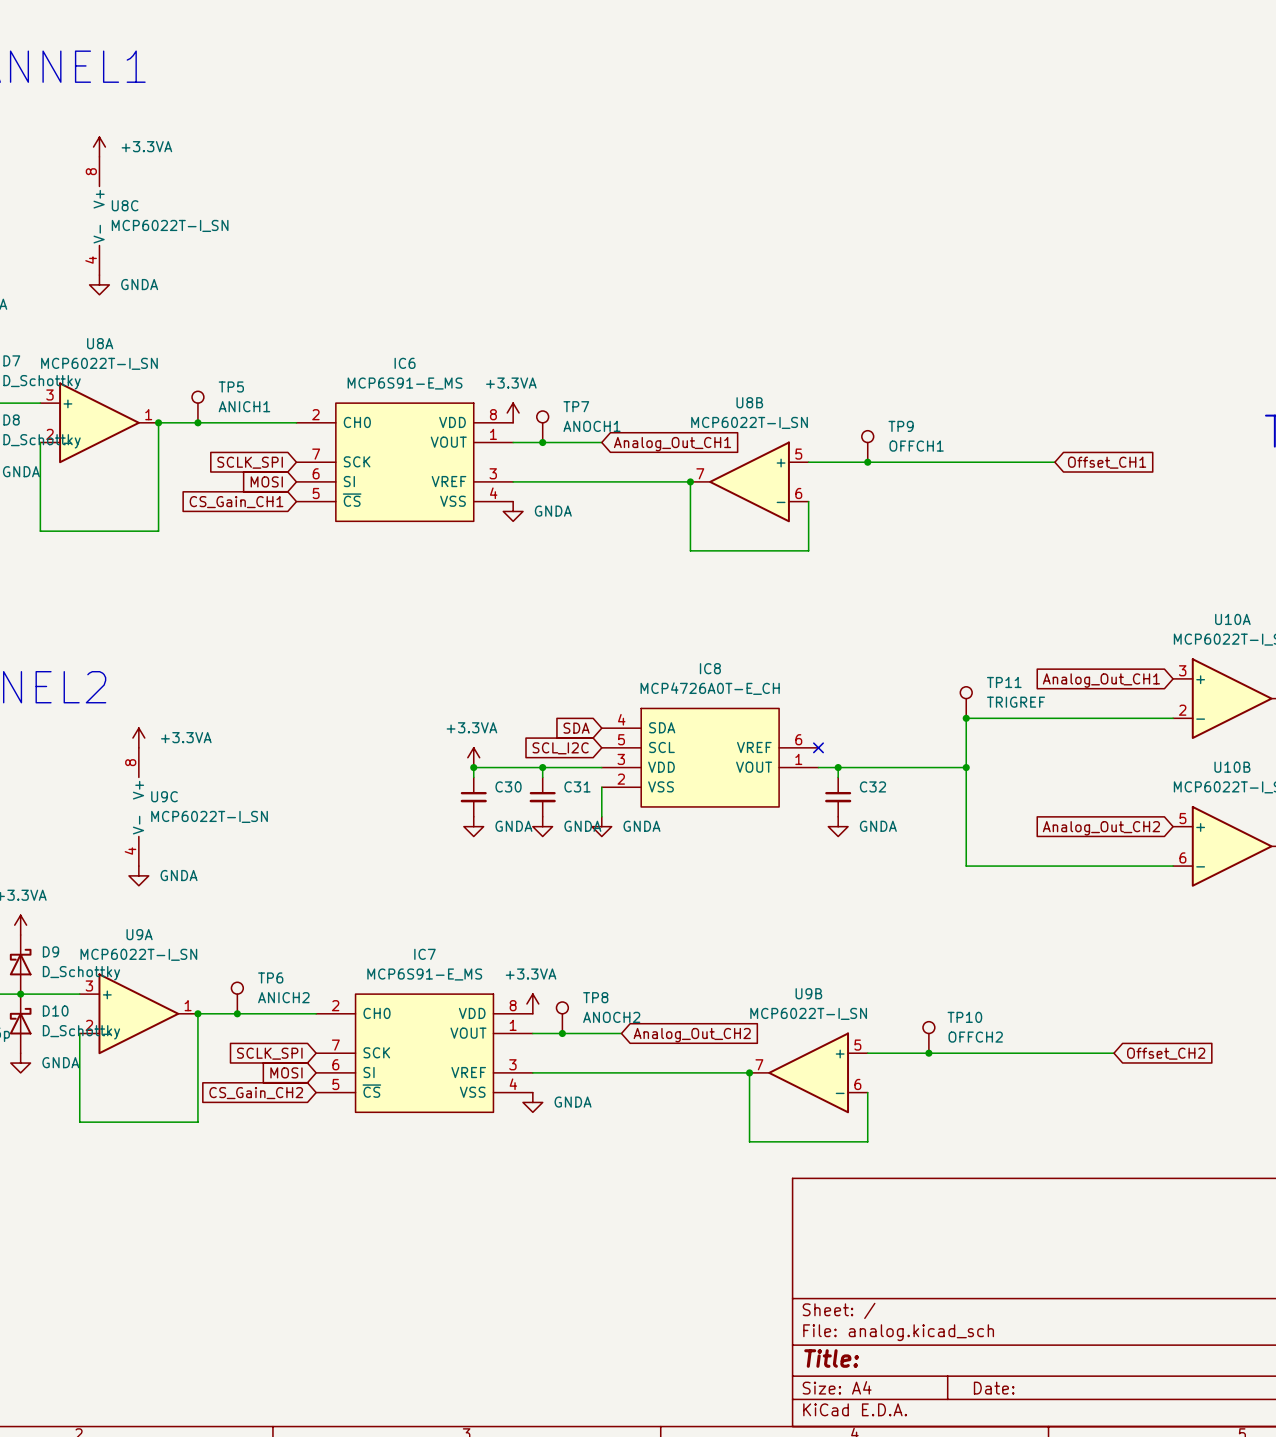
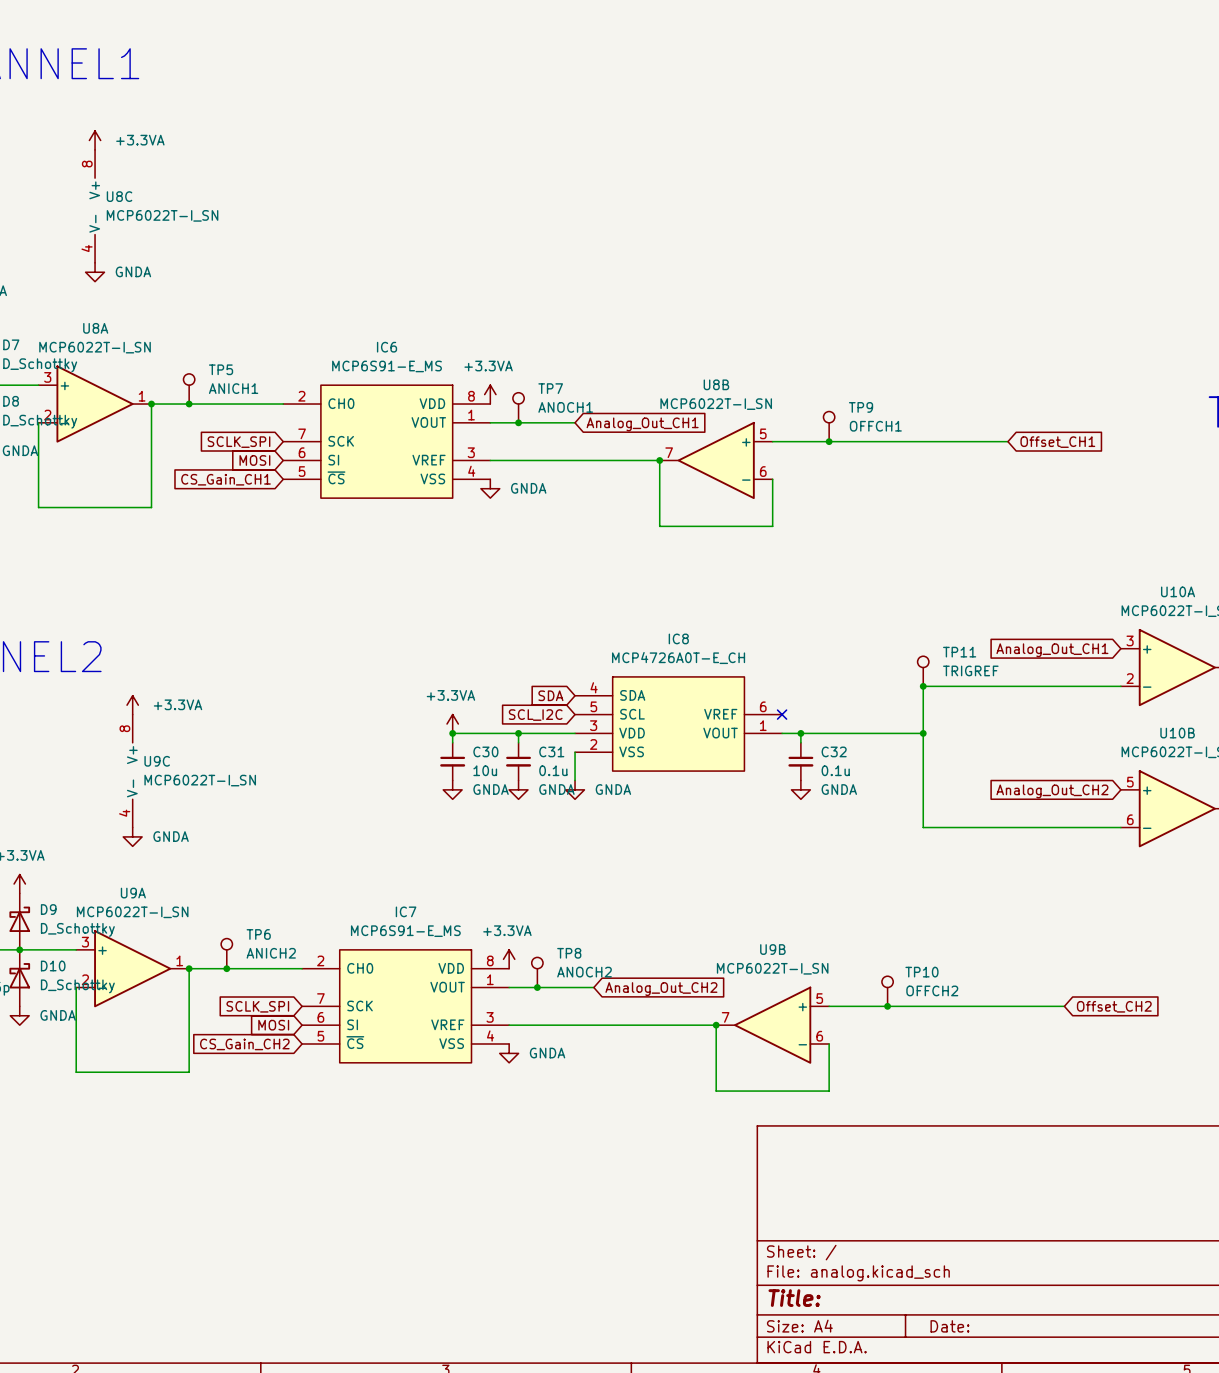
C30 value: none -> 10u (485, 770)
C31 value: none -> 0.1u (553, 770)
C32 value: none -> 0.1u (835, 770)

